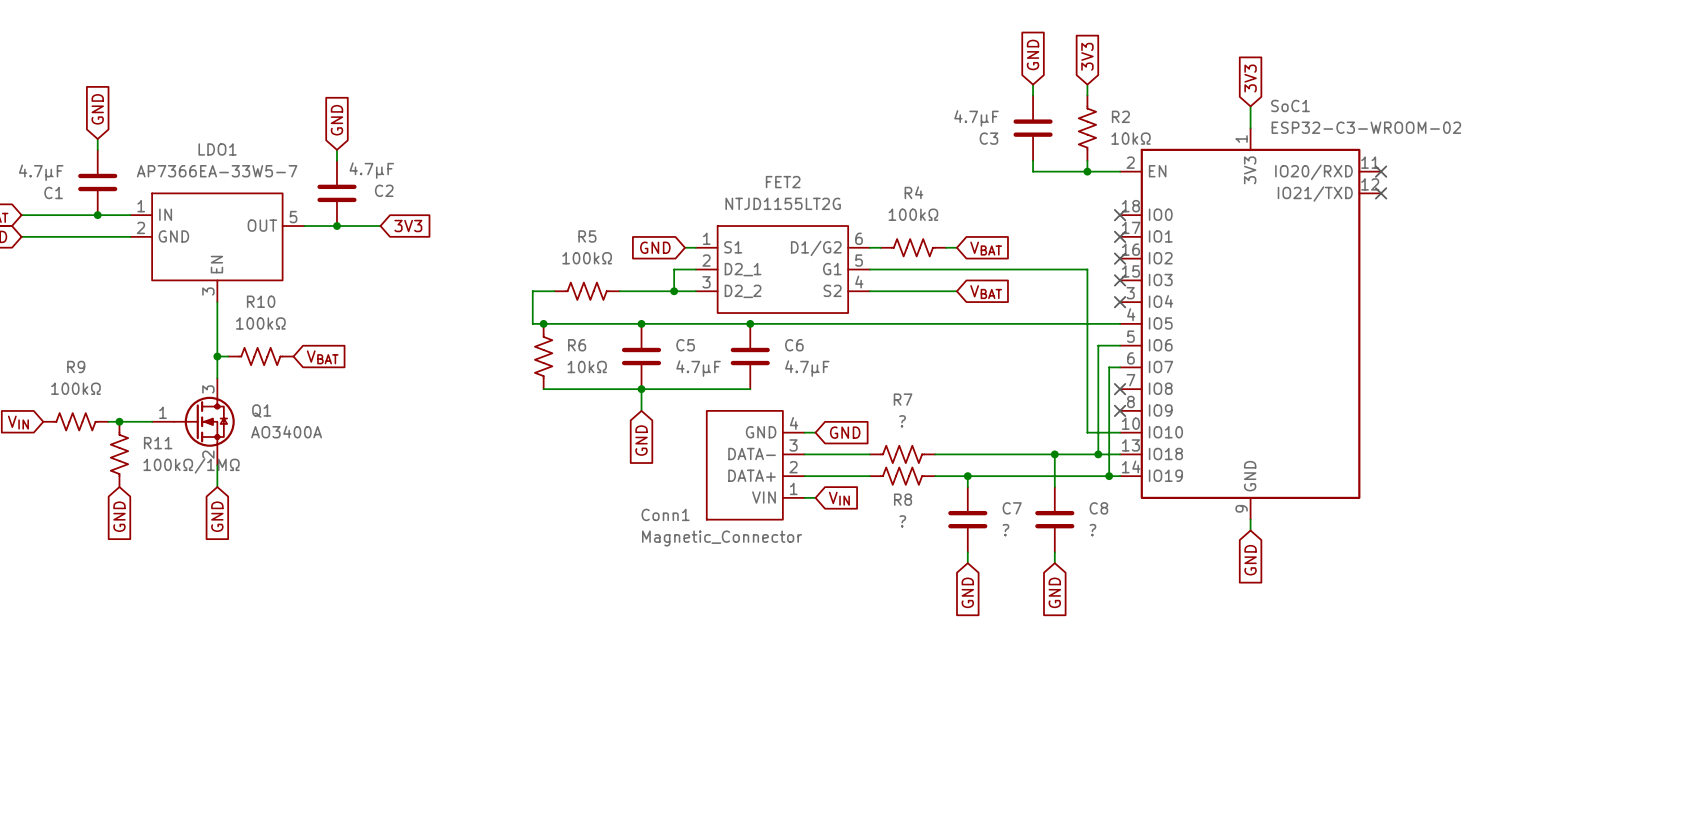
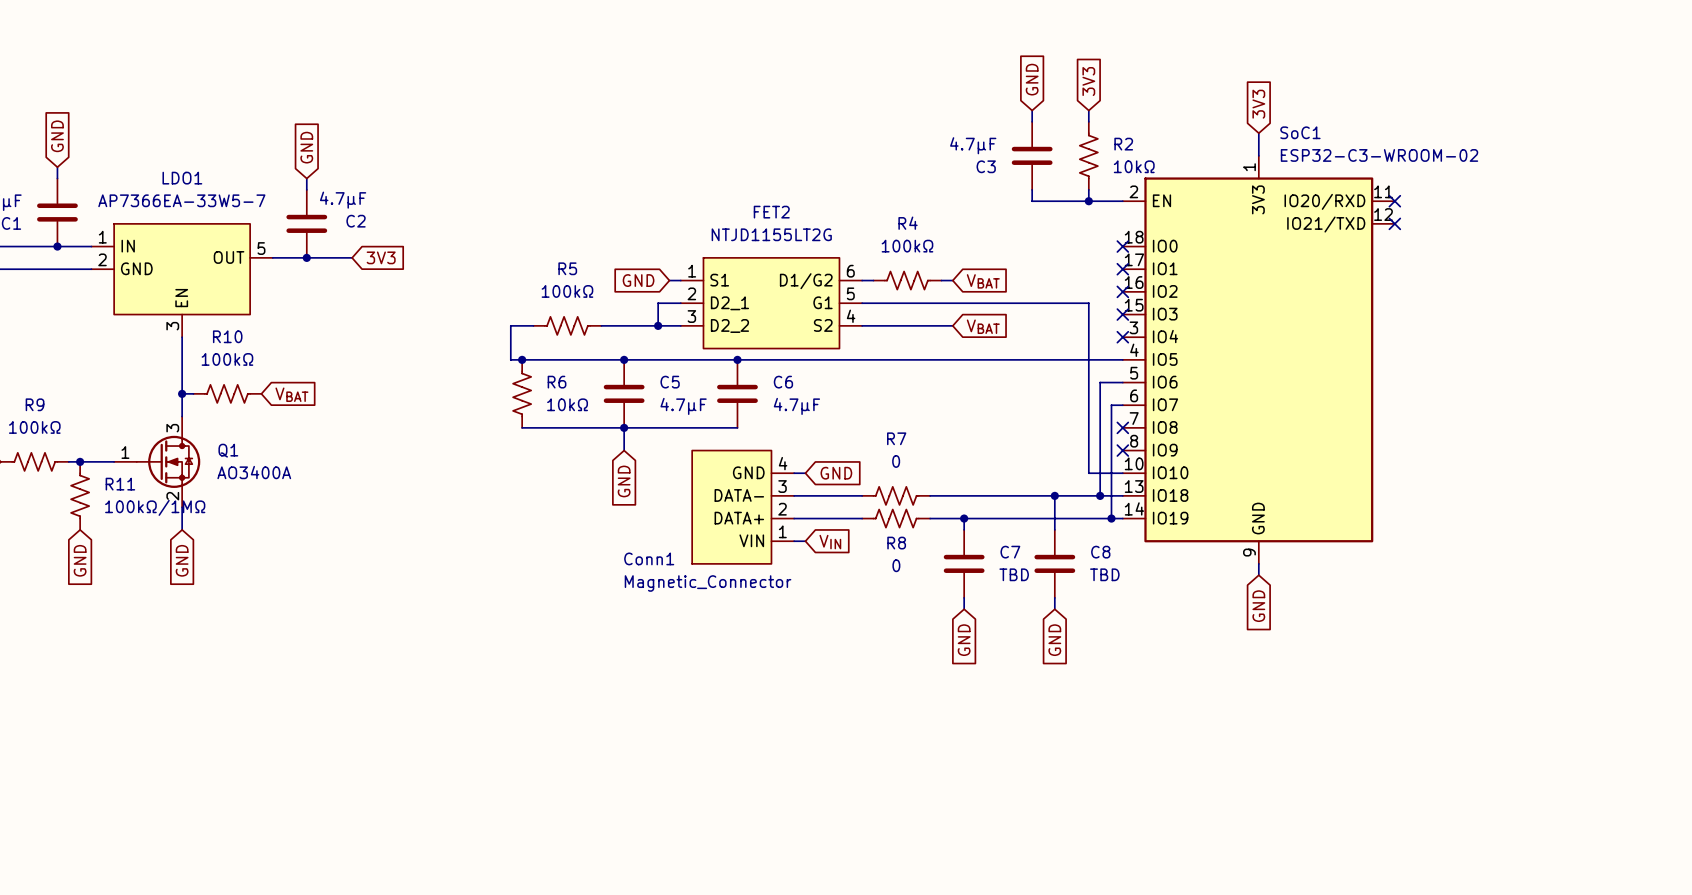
R7 value: ? (902, 421) -> 0 (896, 461)
R8 value: ? (902, 521) -> 0 (896, 565)
C7 value: ? (1005, 530) -> TBD (1014, 574)
C8 value: ? (1092, 530) -> TBD (1104, 574)

